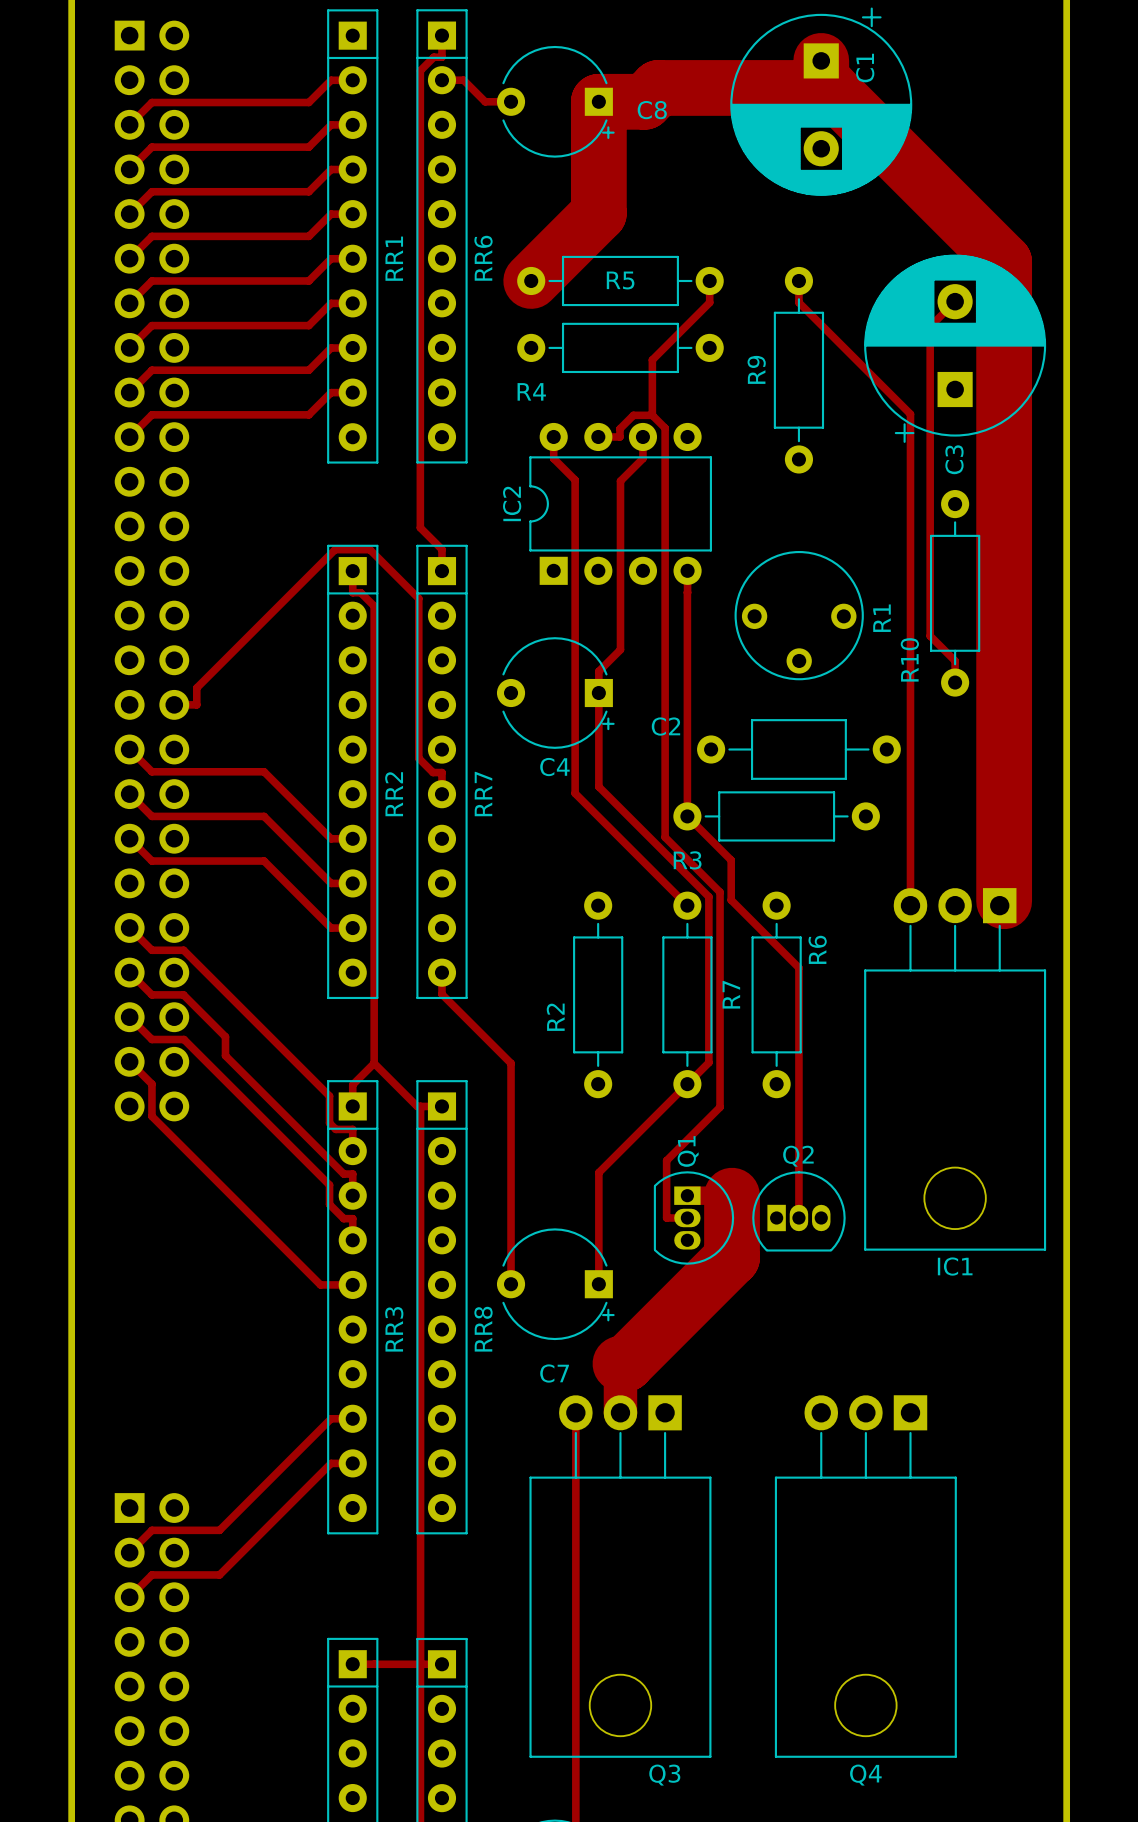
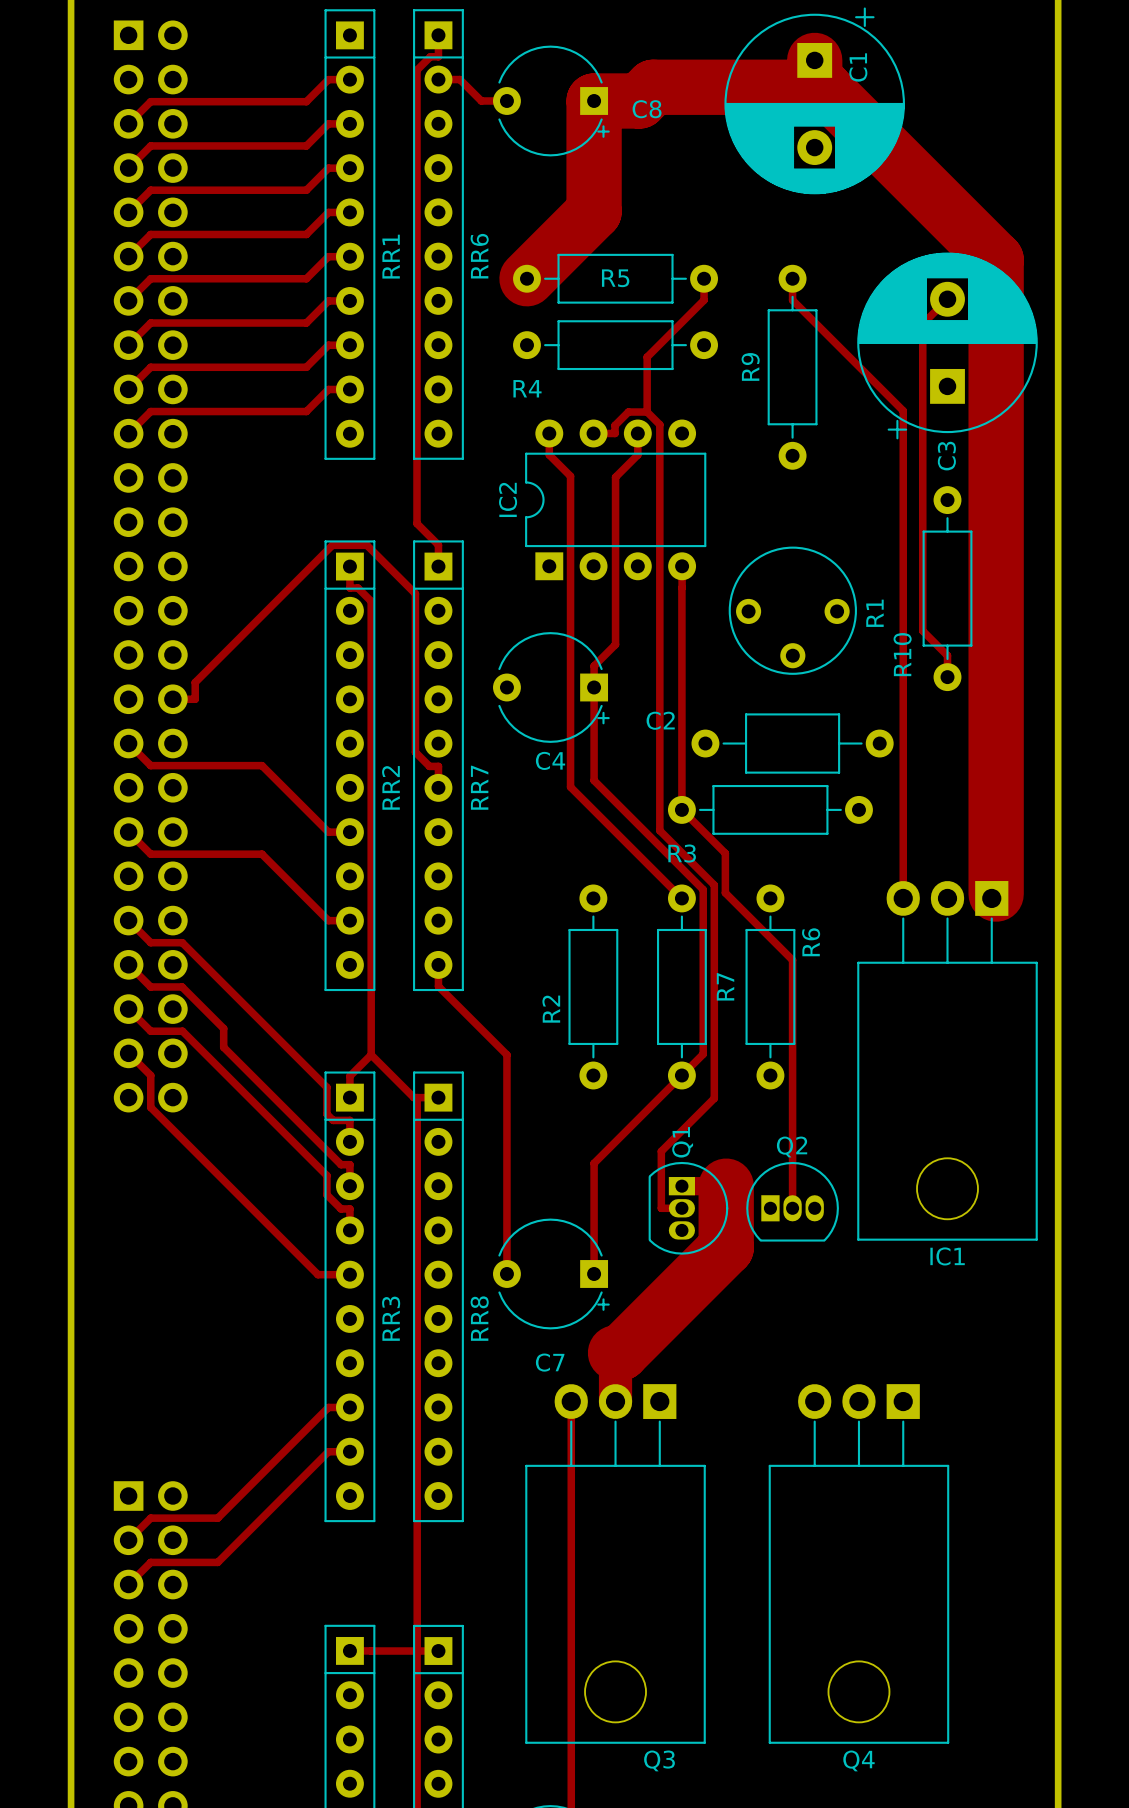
track: (129, 794) (151, 816) (264, 816) (331, 883) (352, 883) -> none

